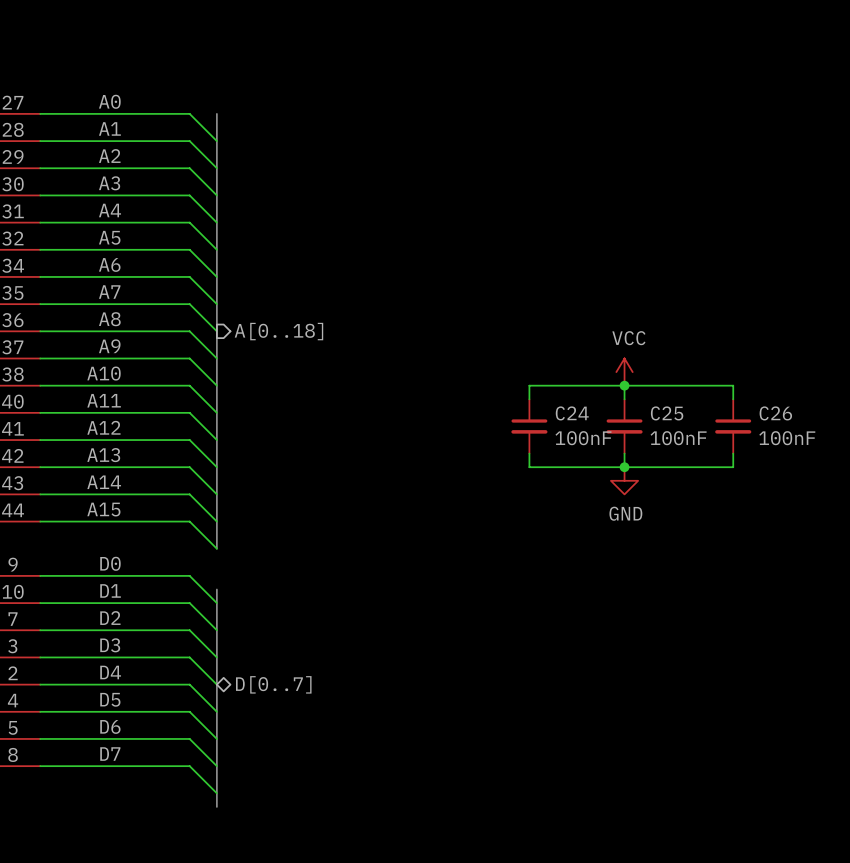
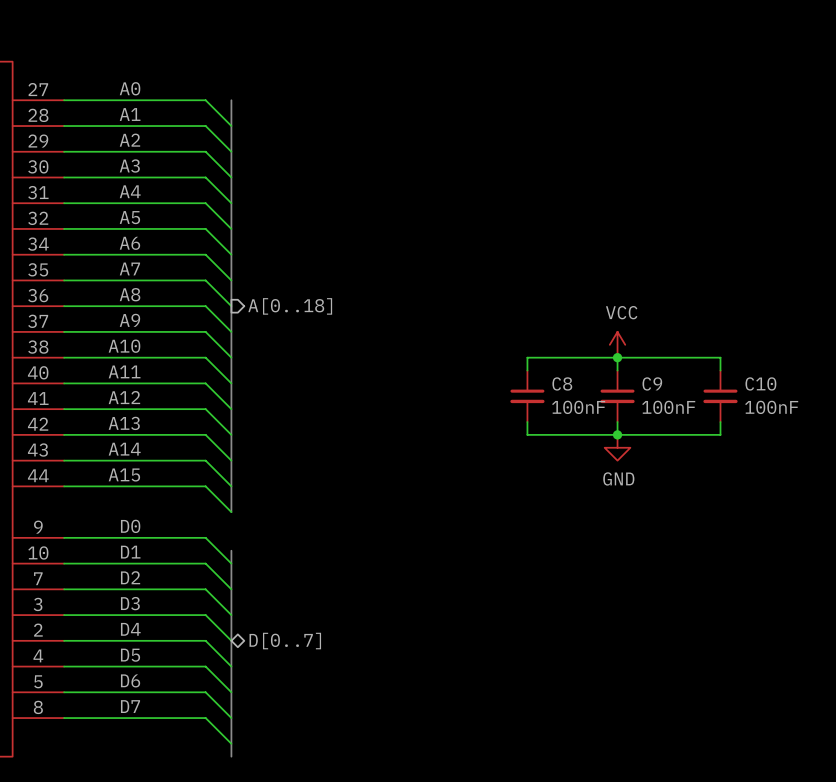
C24 name: C24 (572, 413) -> C8 (562, 383)
C25 name: C25 (667, 413) -> C9 (652, 383)
C26 name: C26 (775, 413) -> C10 (760, 383)

